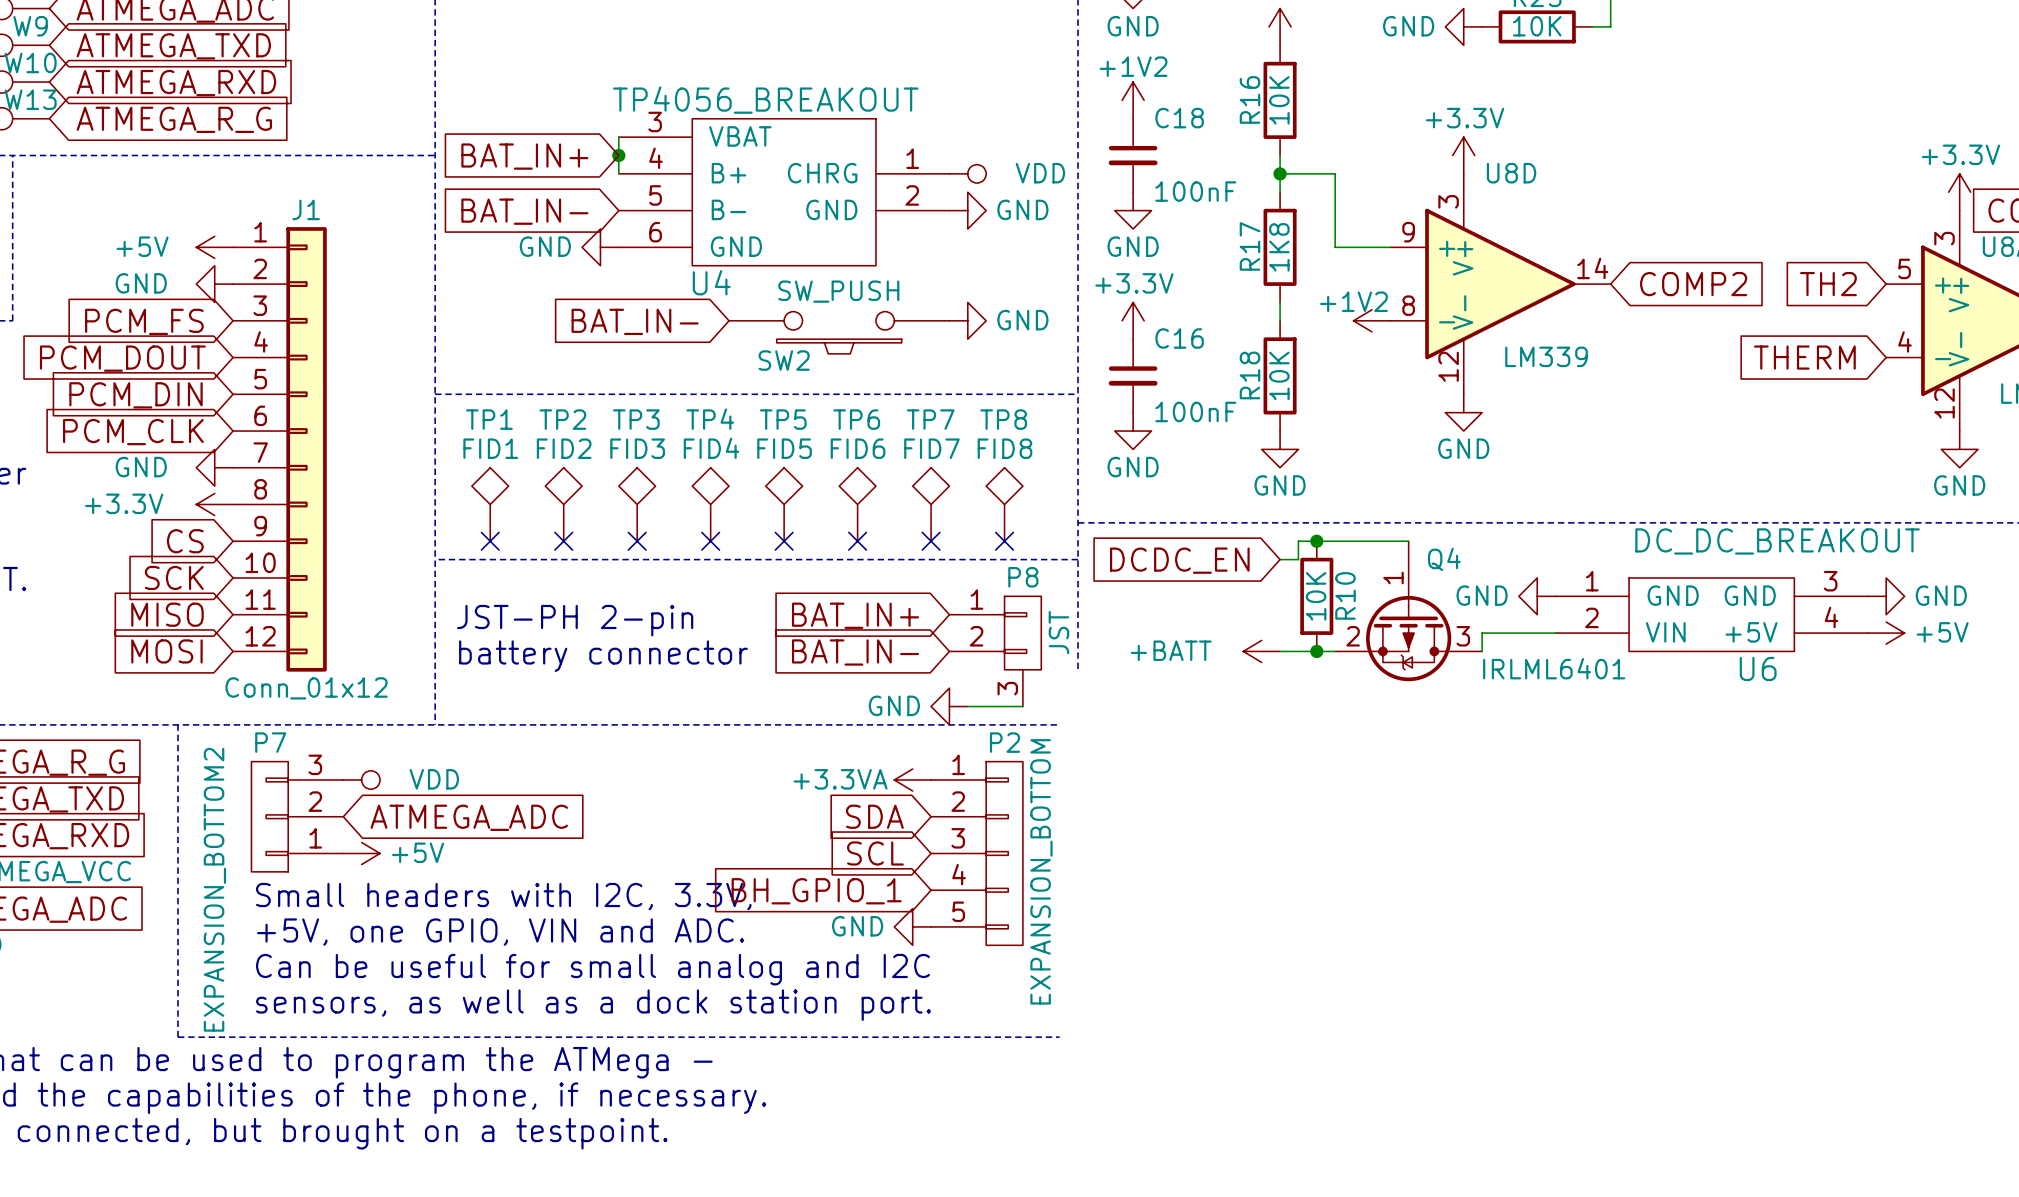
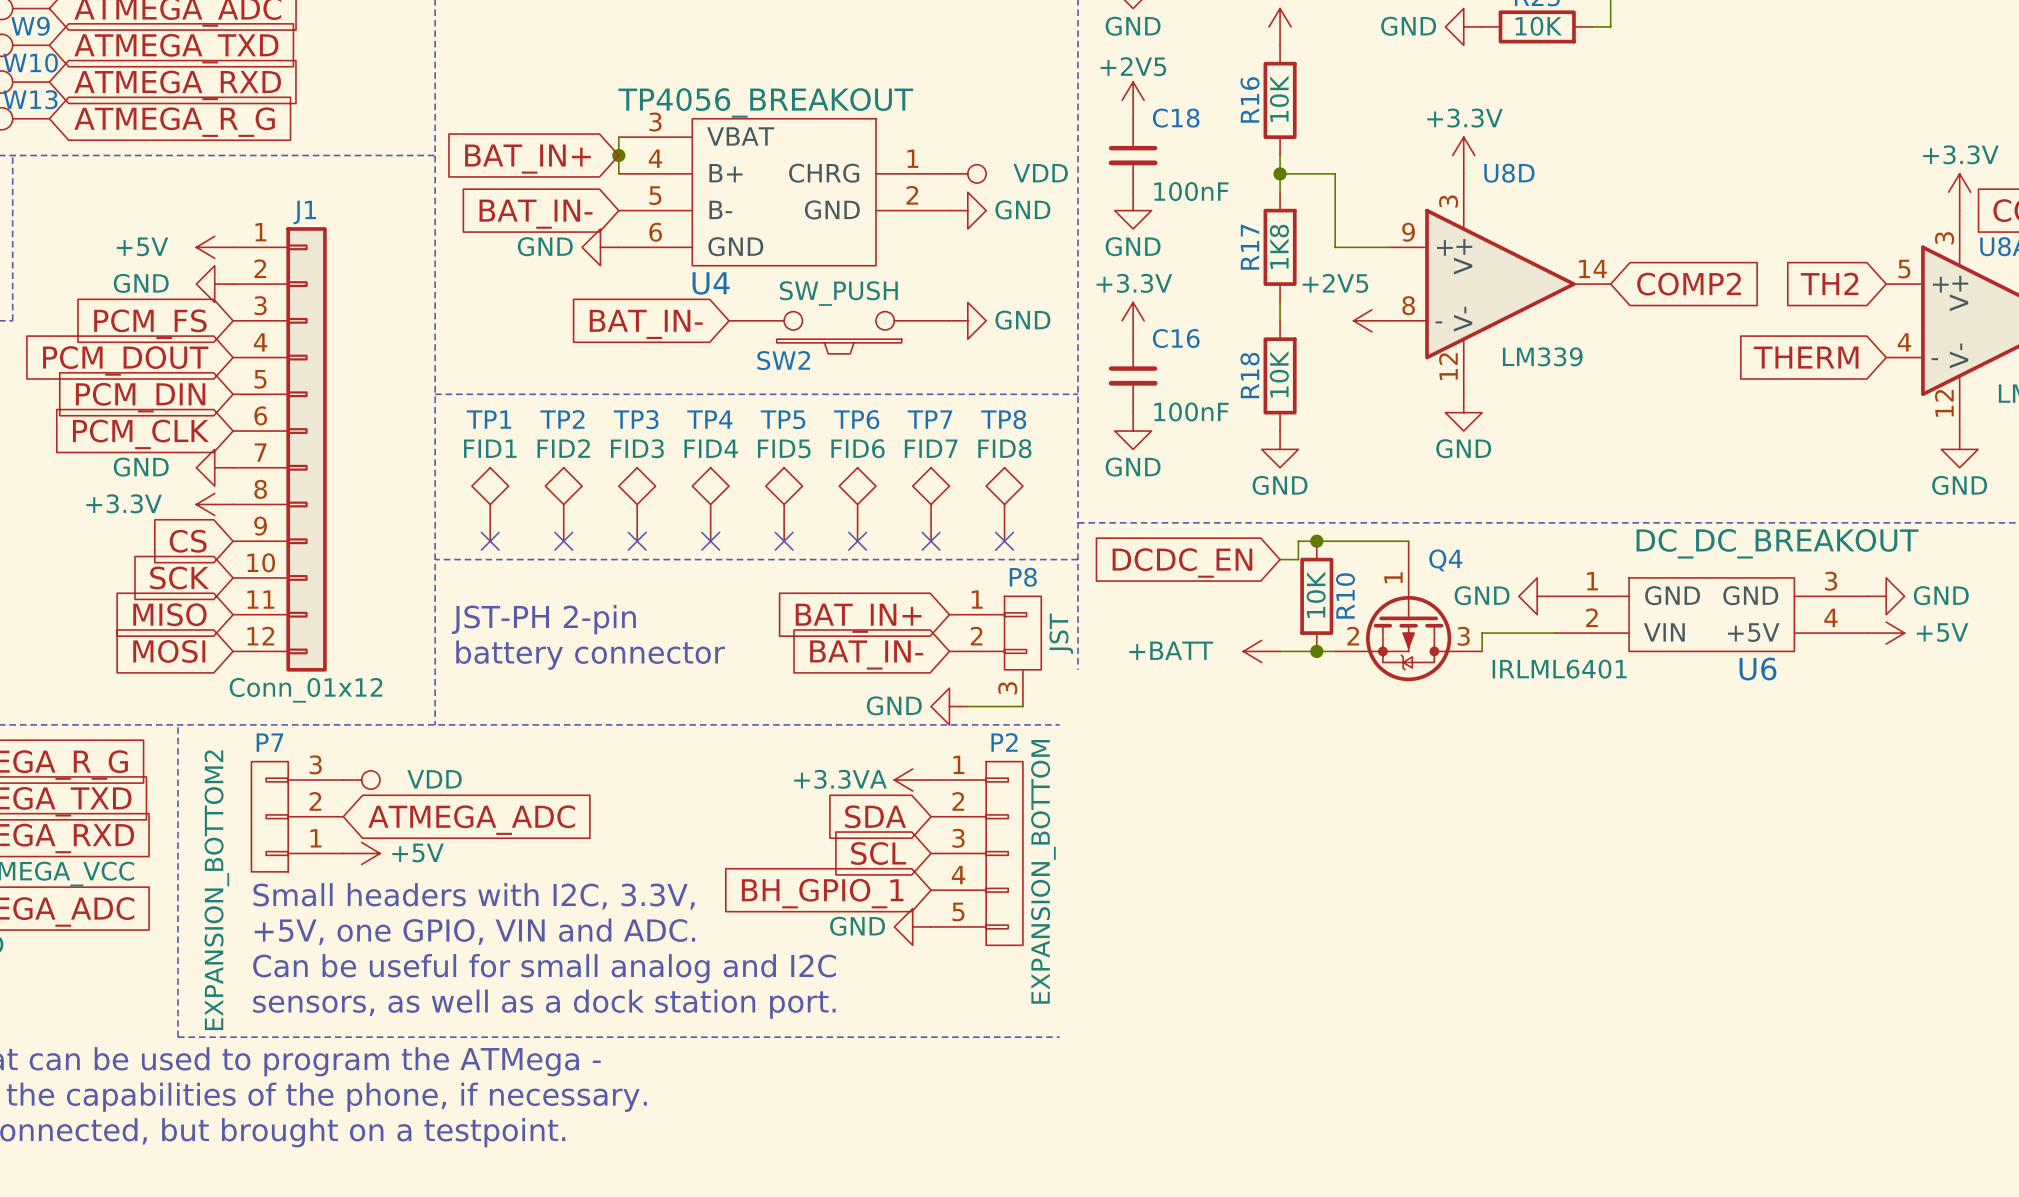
power symbol: +1V2 (1133, 100) -> +2V5 (1133, 100)
power symbol: +1V2 (1371, 320) -> +2V5 (1371, 320)

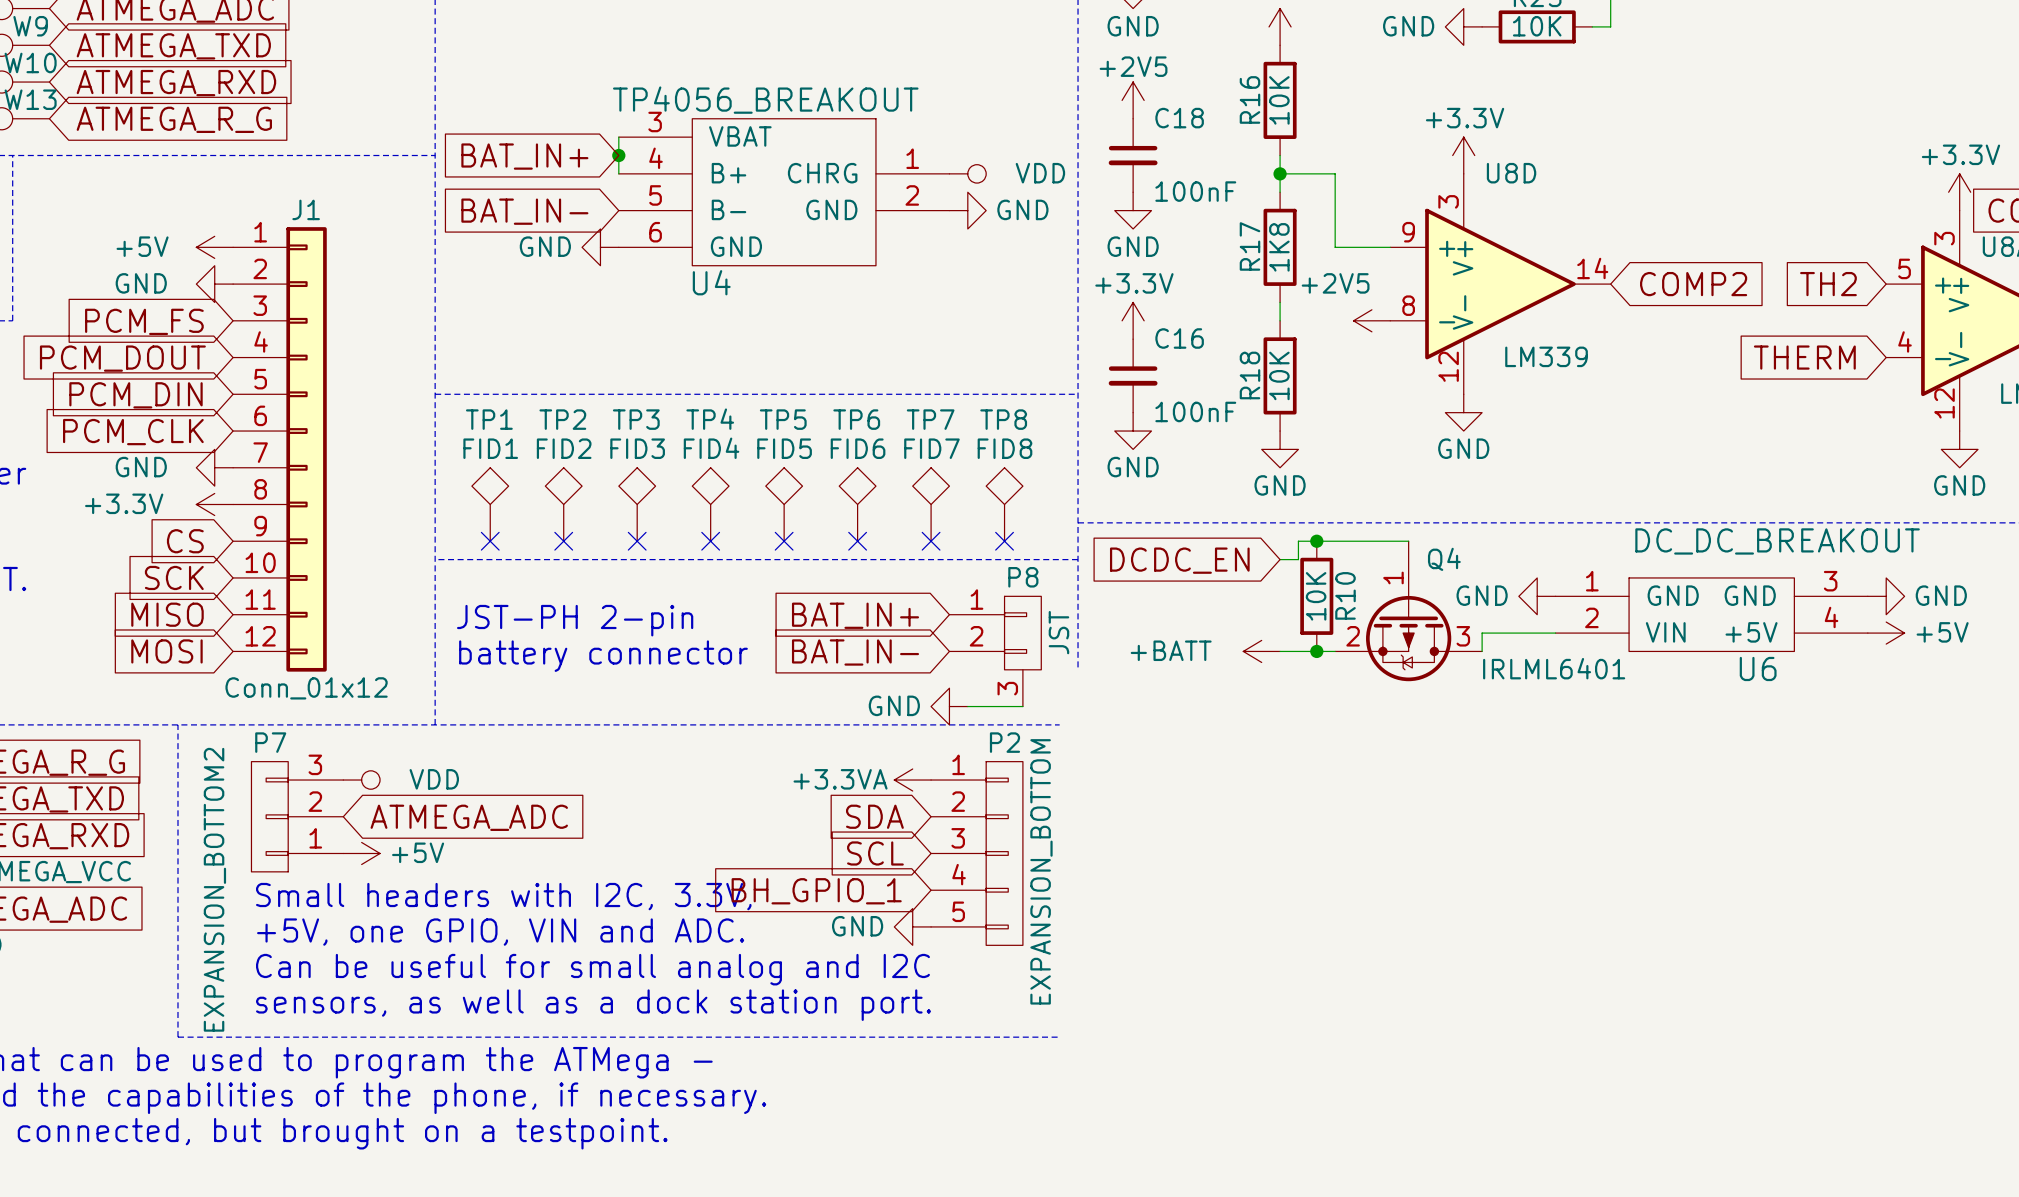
power symbol: GND (967, 320) -> none
global label: BAT_IN- (646, 324) -> none
SW2: SW_PUSH (839, 332) -> none

